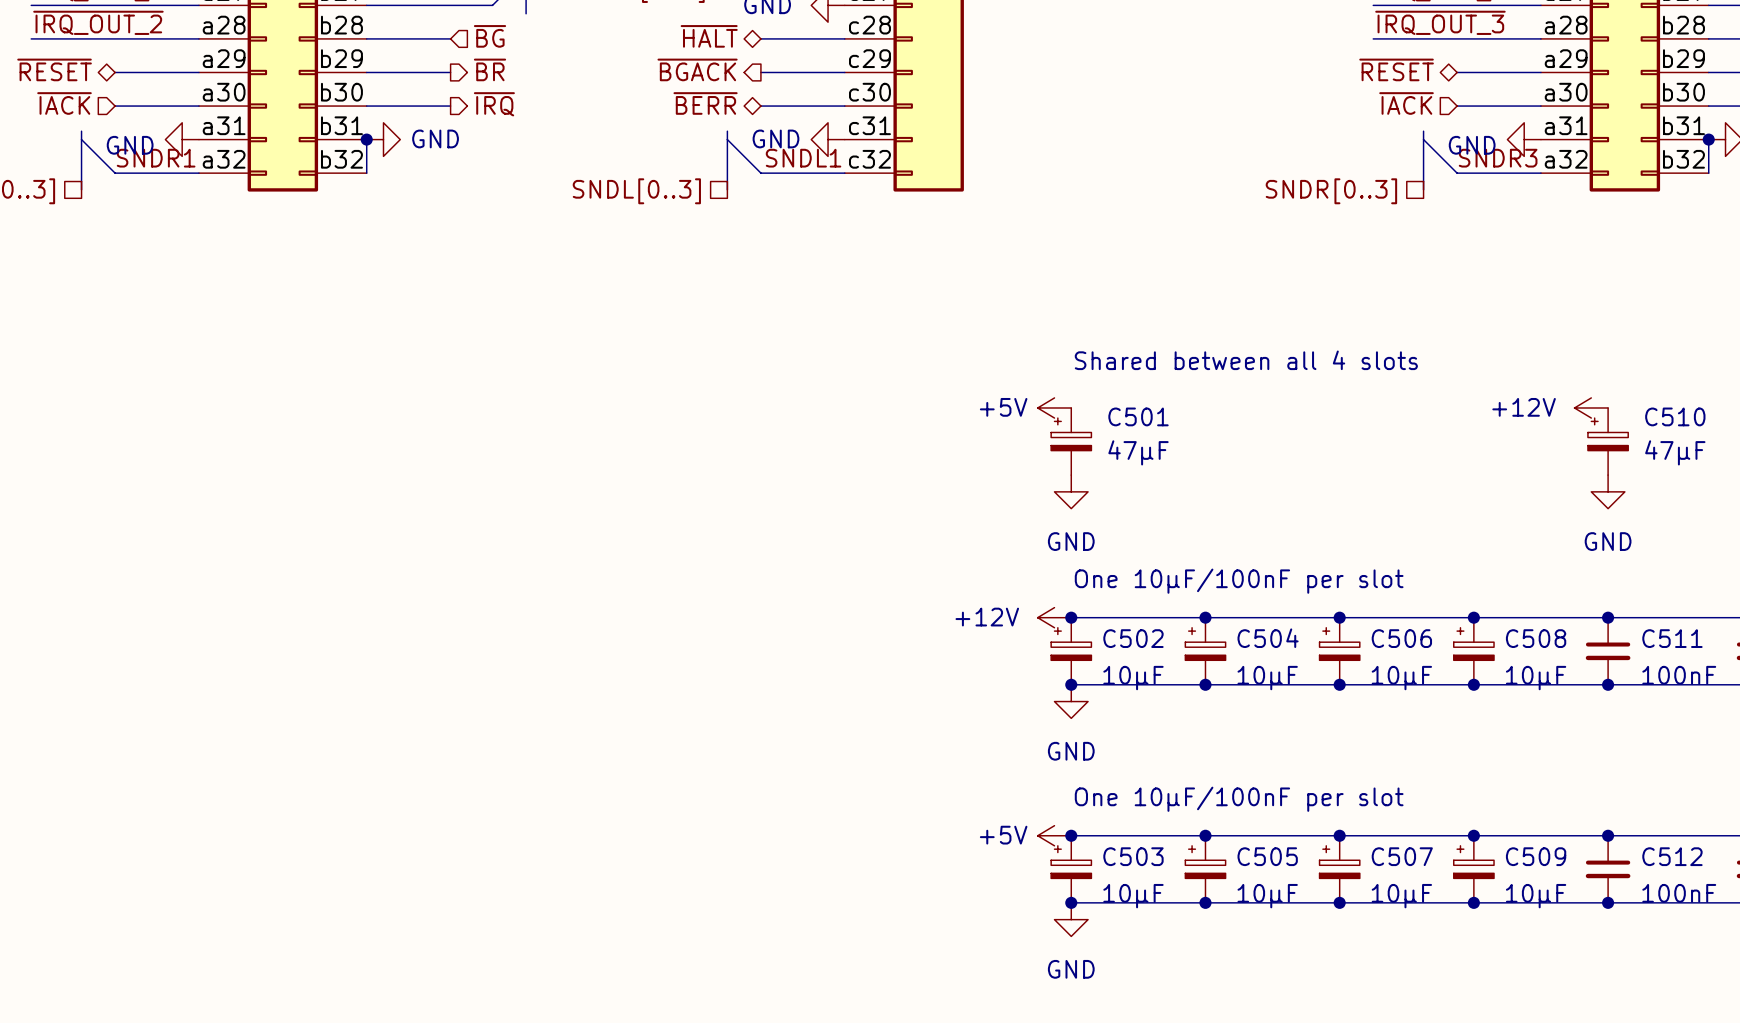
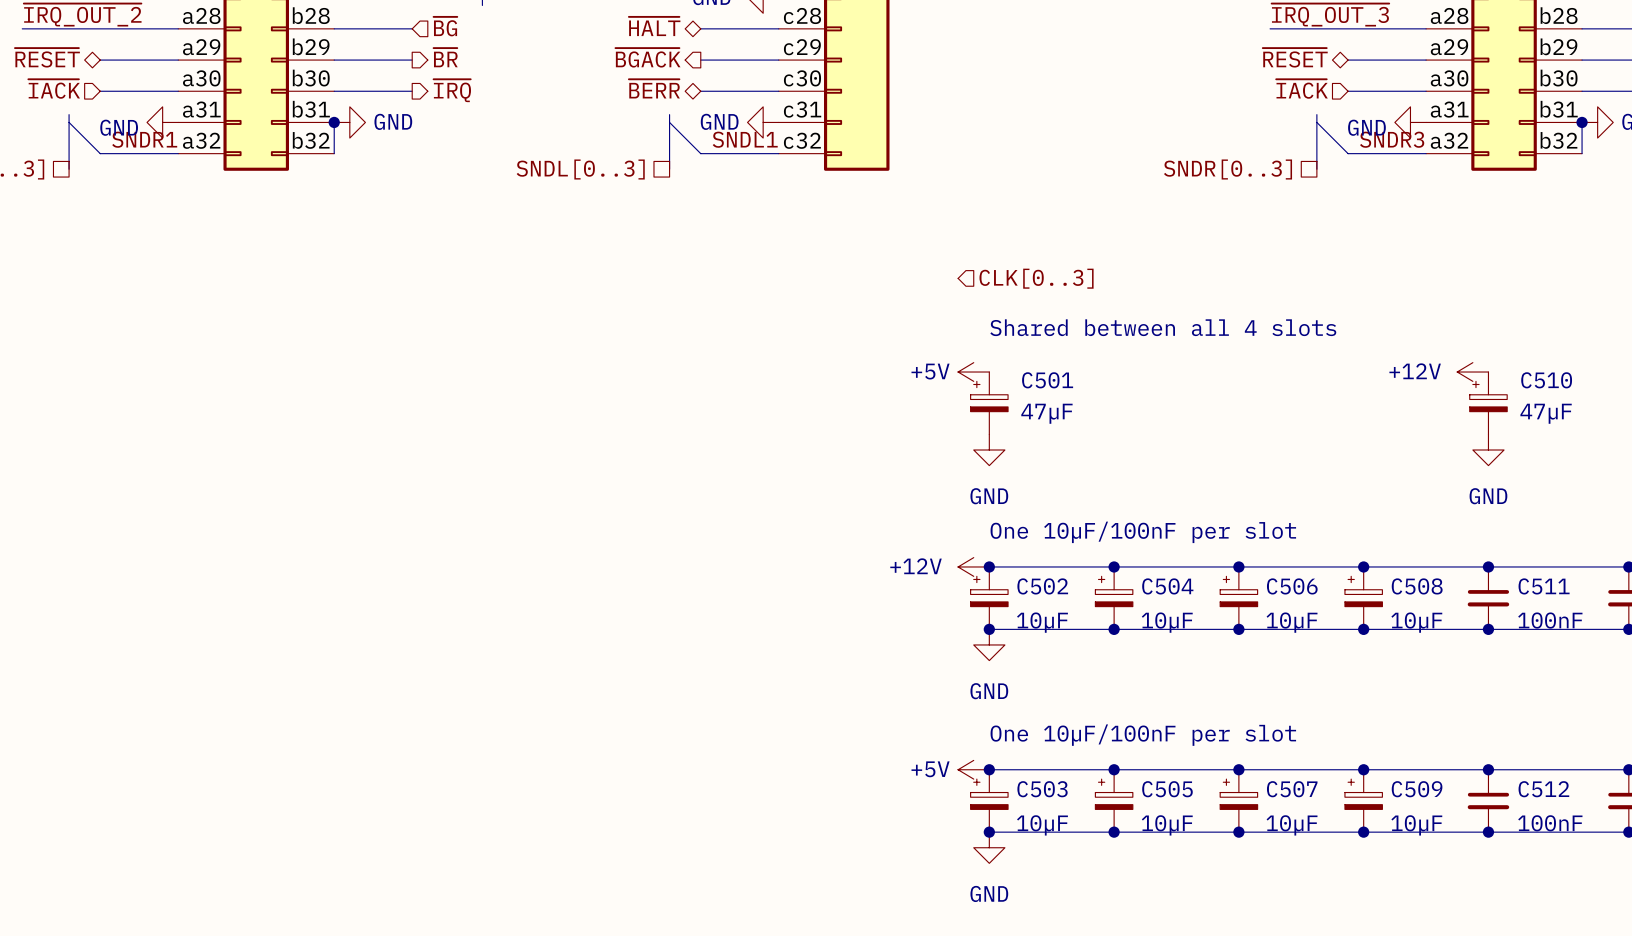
hierarchical label: none -> CLK[0..3] (1036, 278)

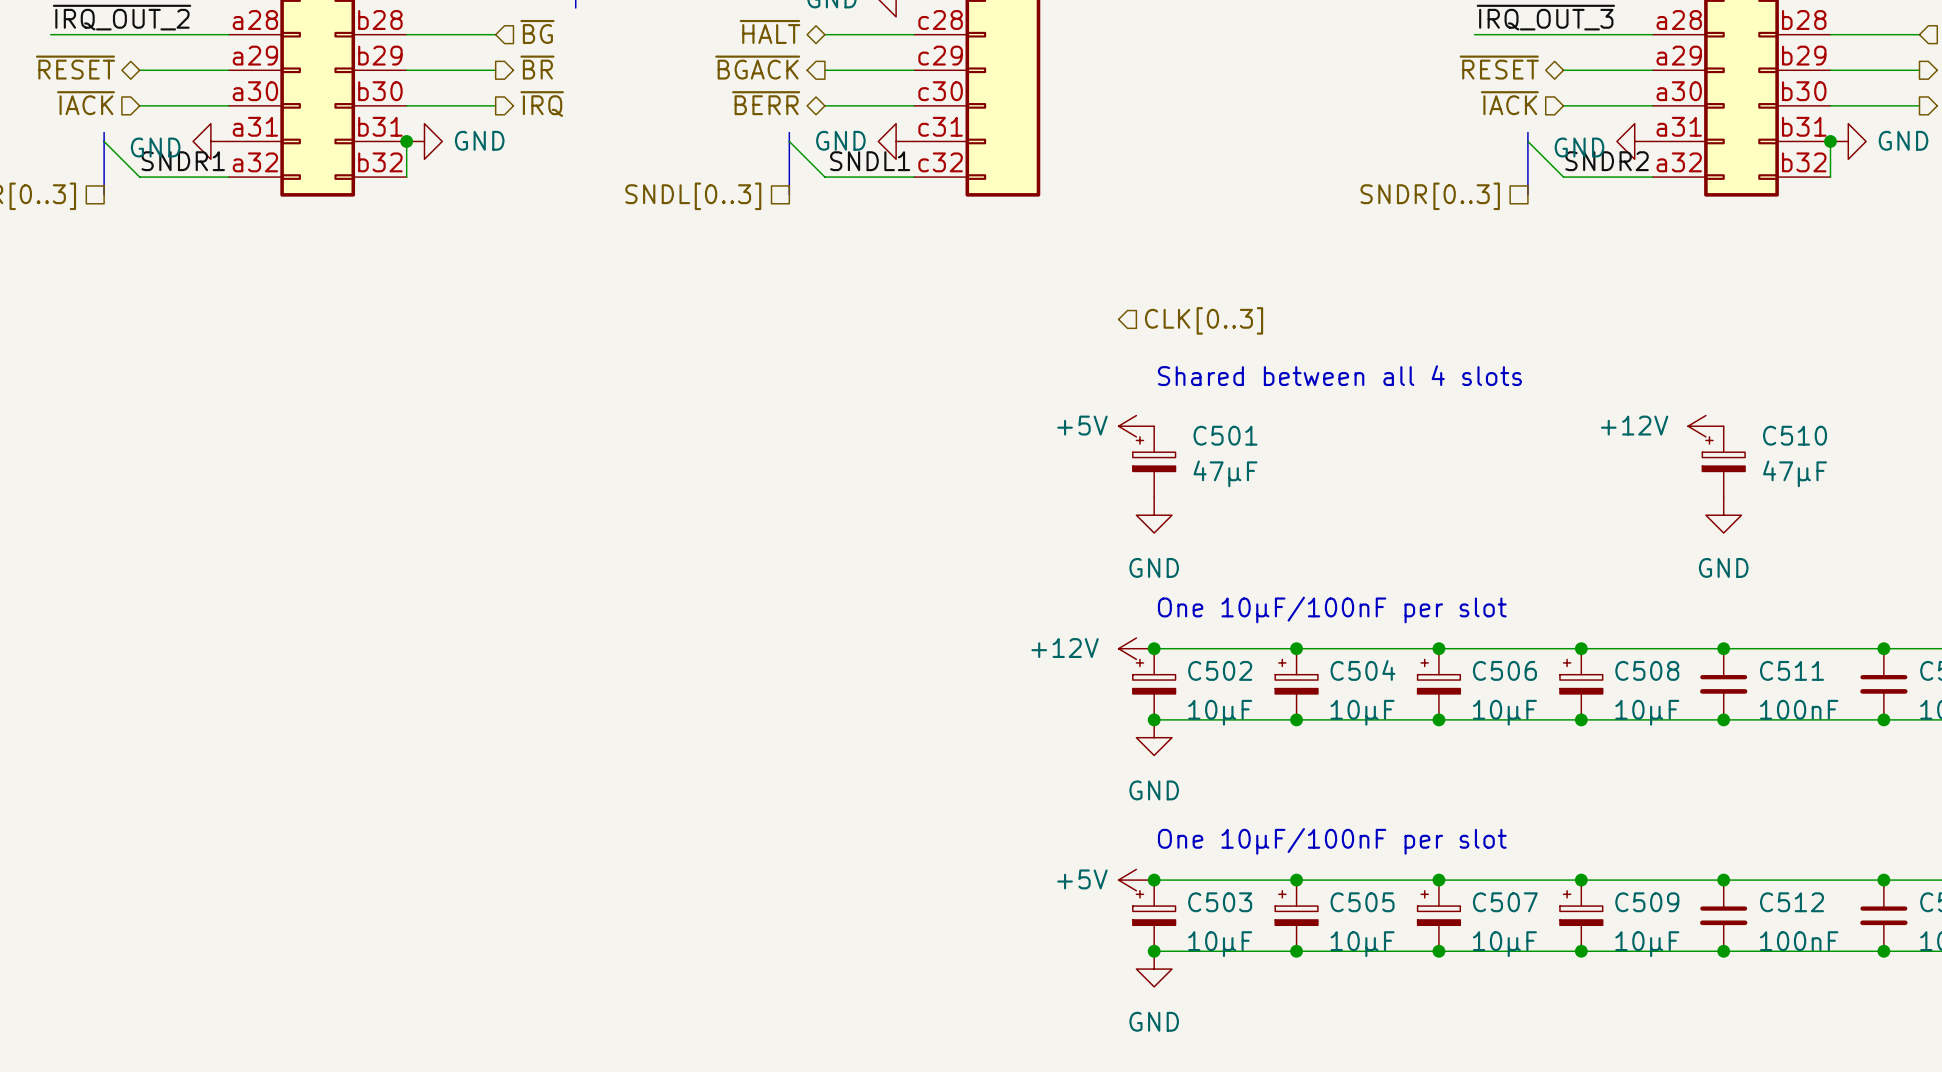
label: SNDR3 (1392, 139) -> SNDR2 (1607, 161)

